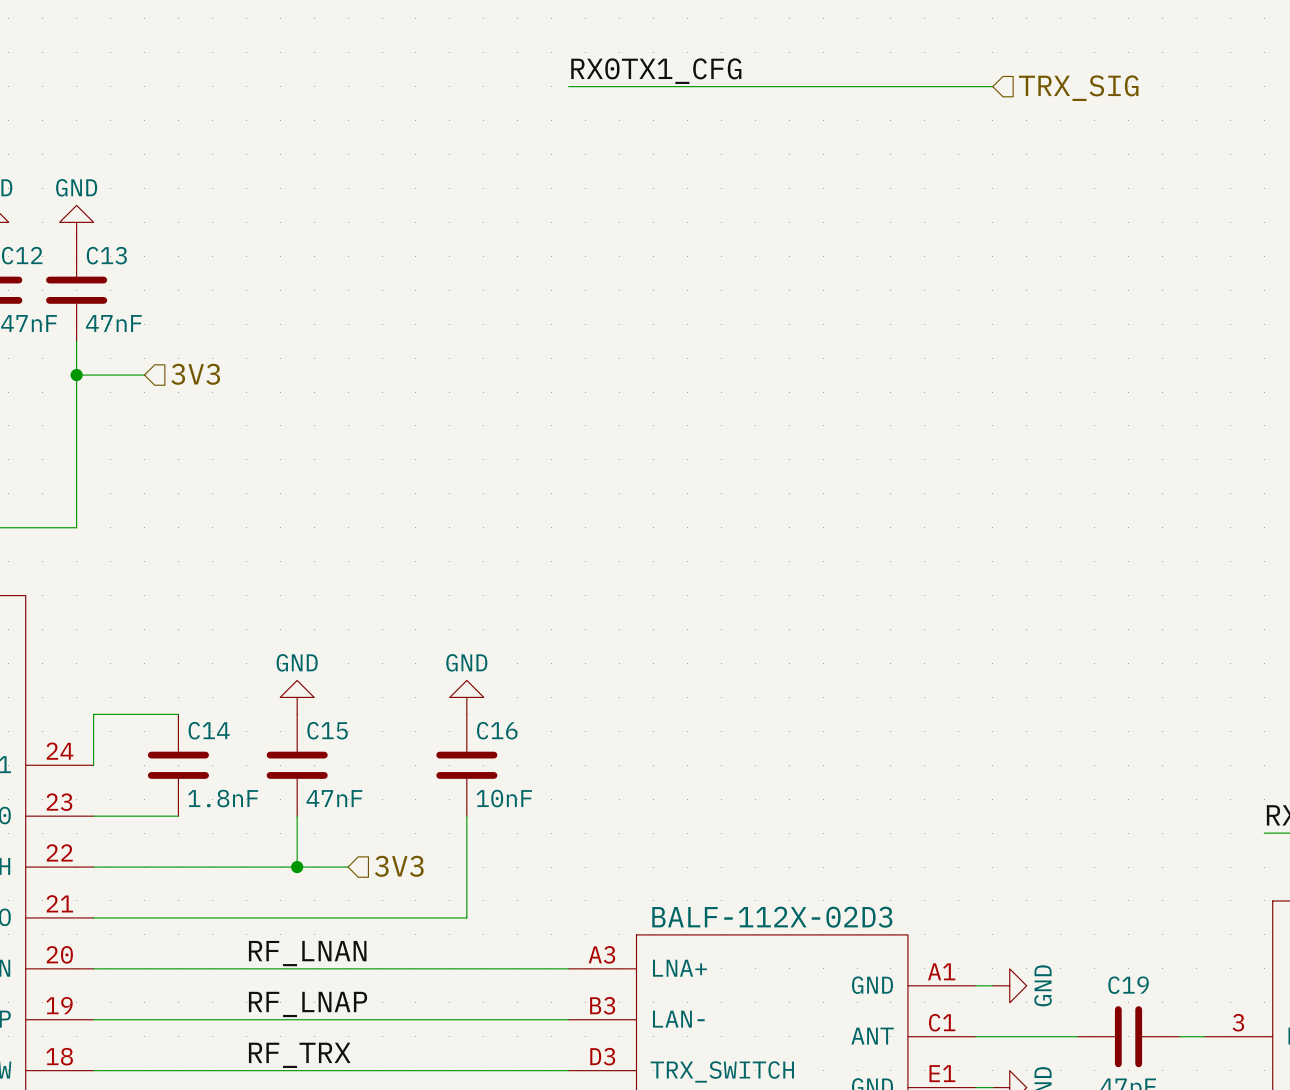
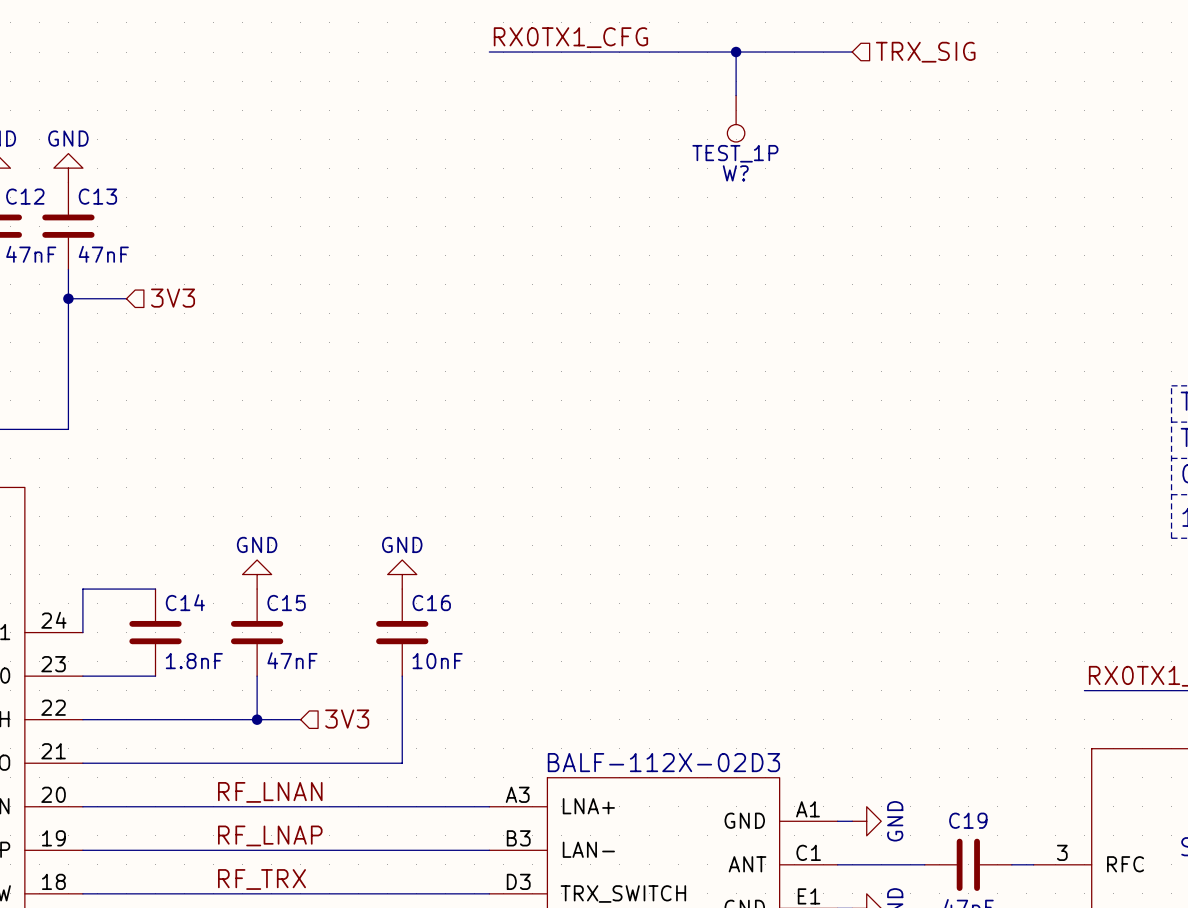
wire: none -> (736, 52) (736, 95)
junction: none -> (736, 52)
W?: none -> TEST_1P (736, 118)

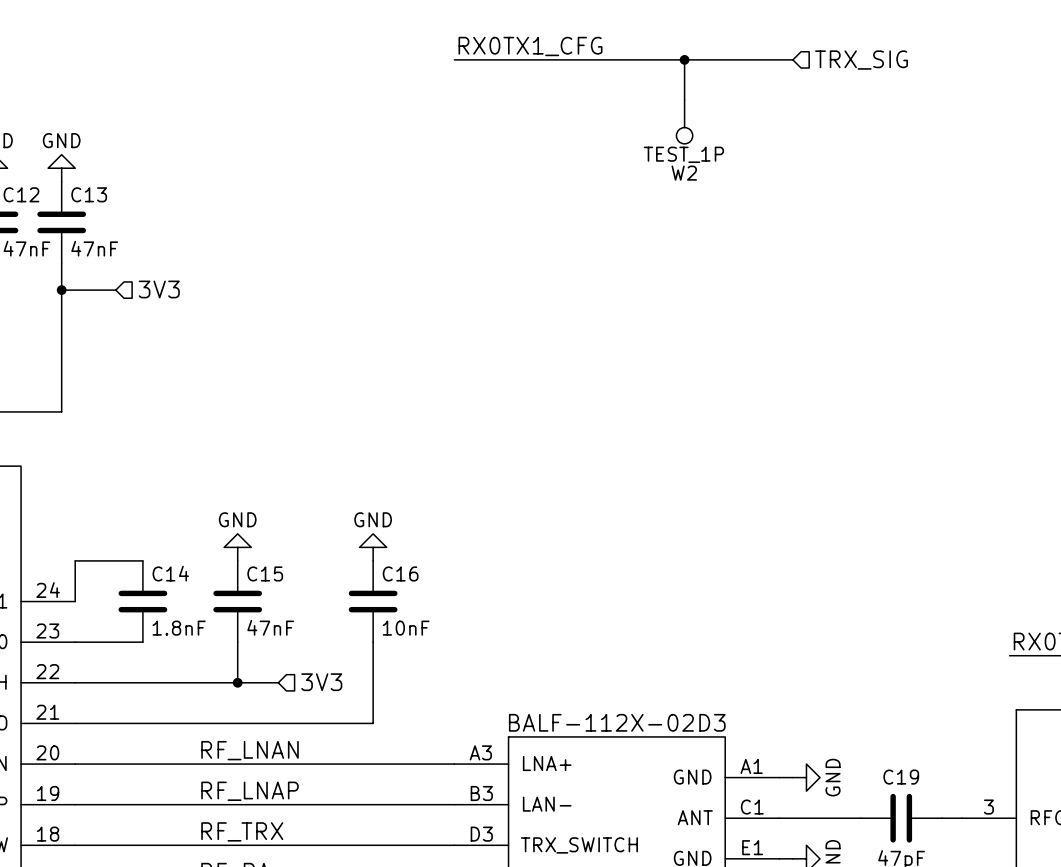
W? name: W? (735, 173) -> W2 (684, 173)

